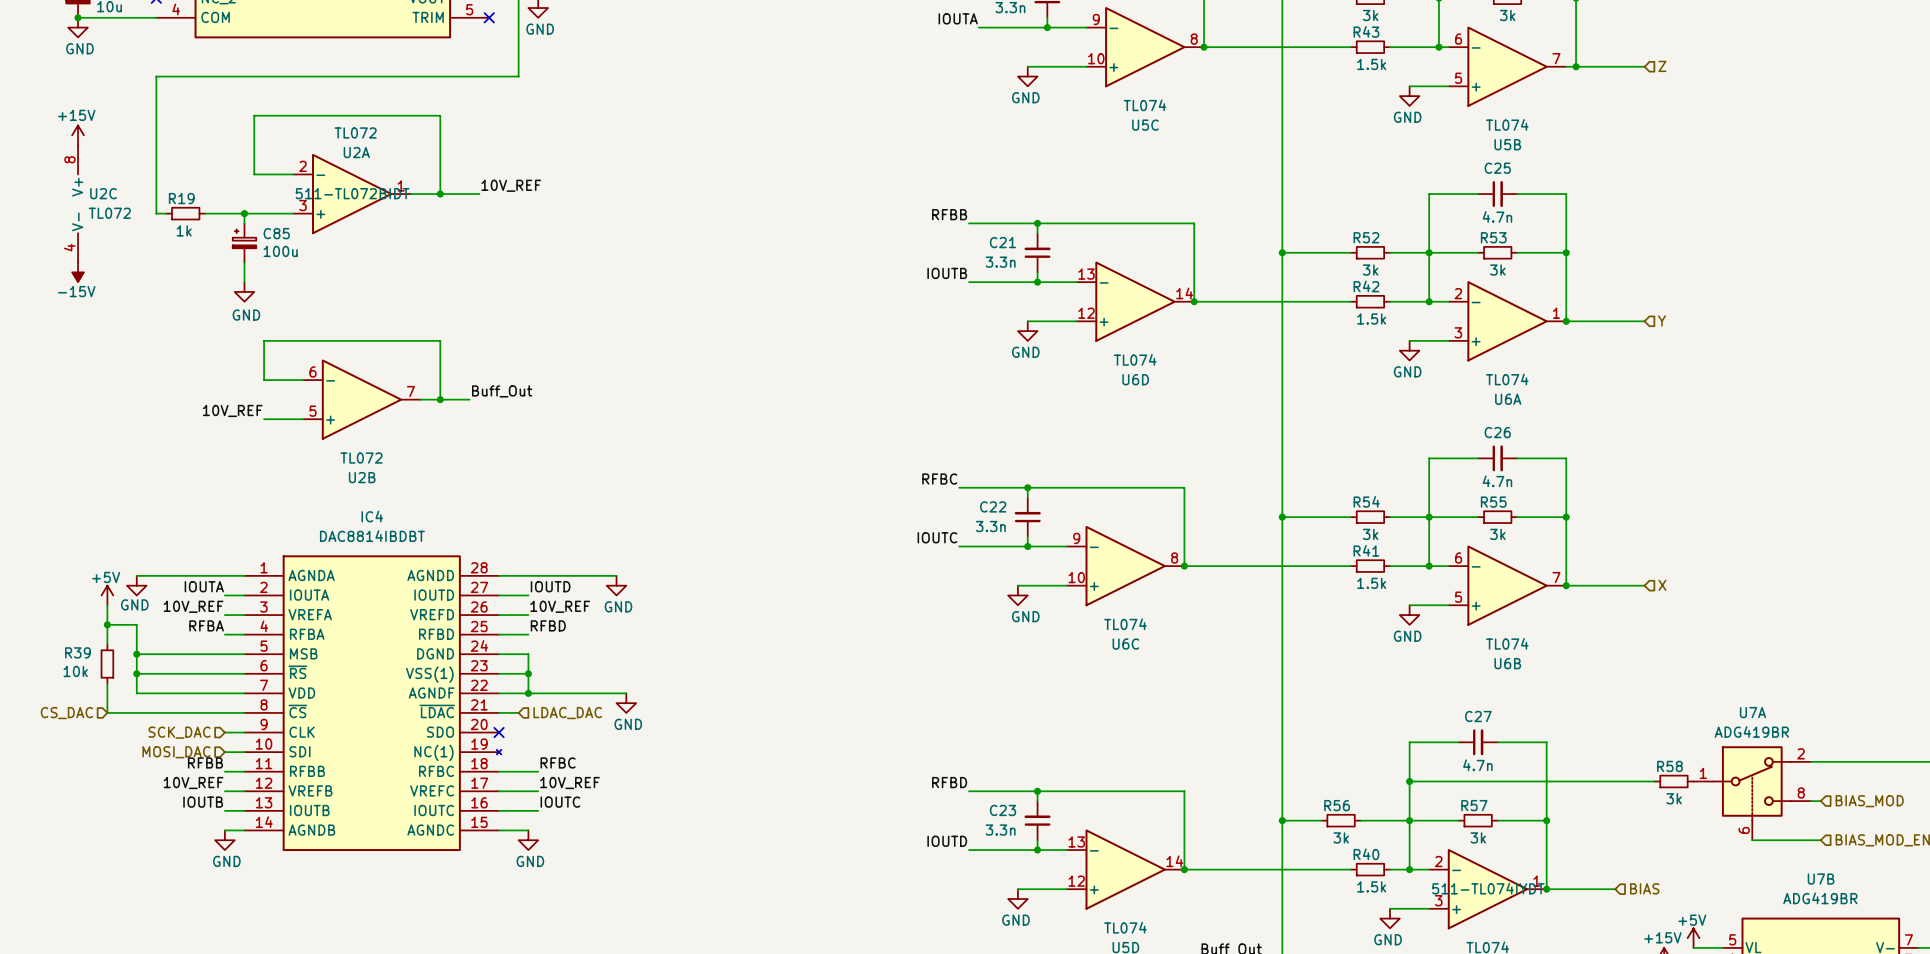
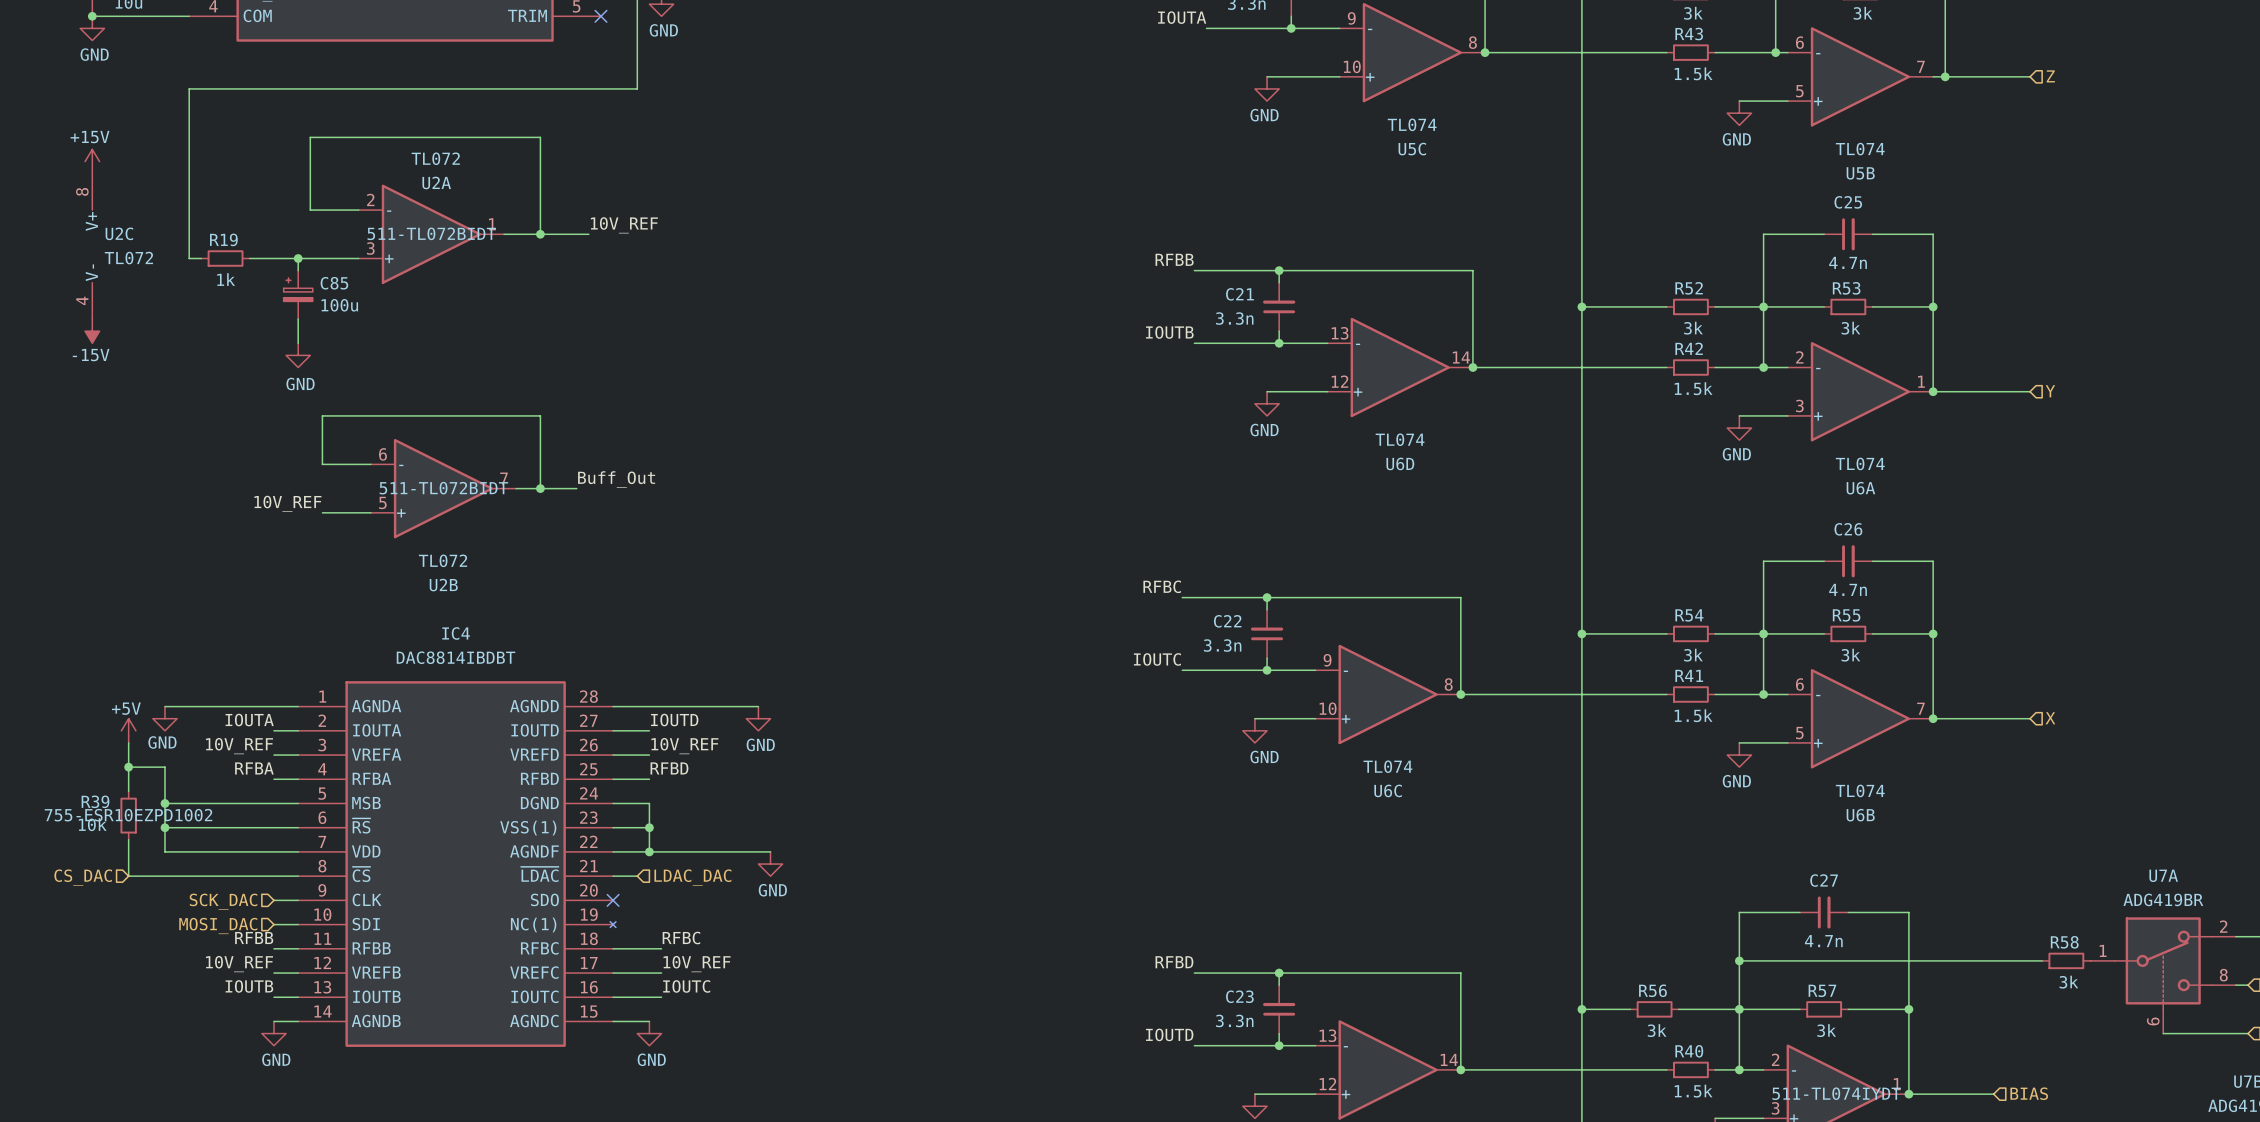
U2B text: none -> 511-TL072BIDT (443, 488)
R39 text: none -> 755-ESR10EZPD1002 (128, 815)

